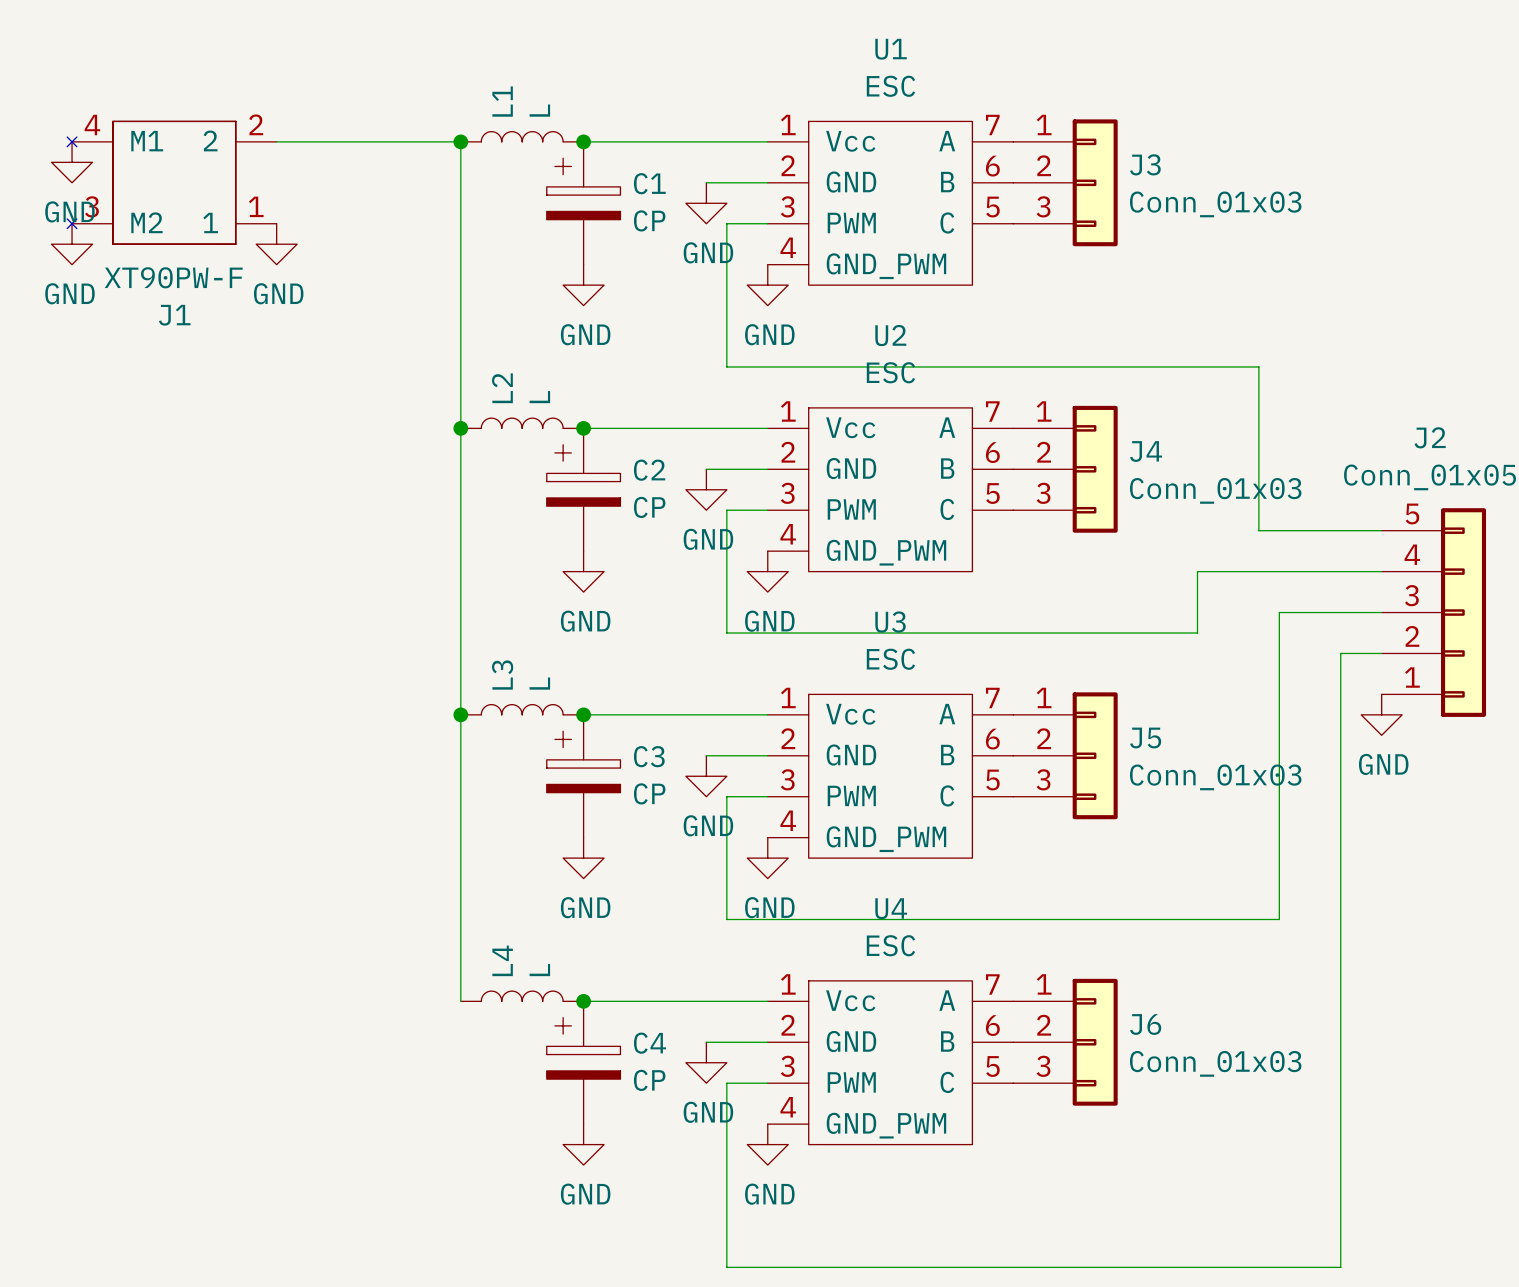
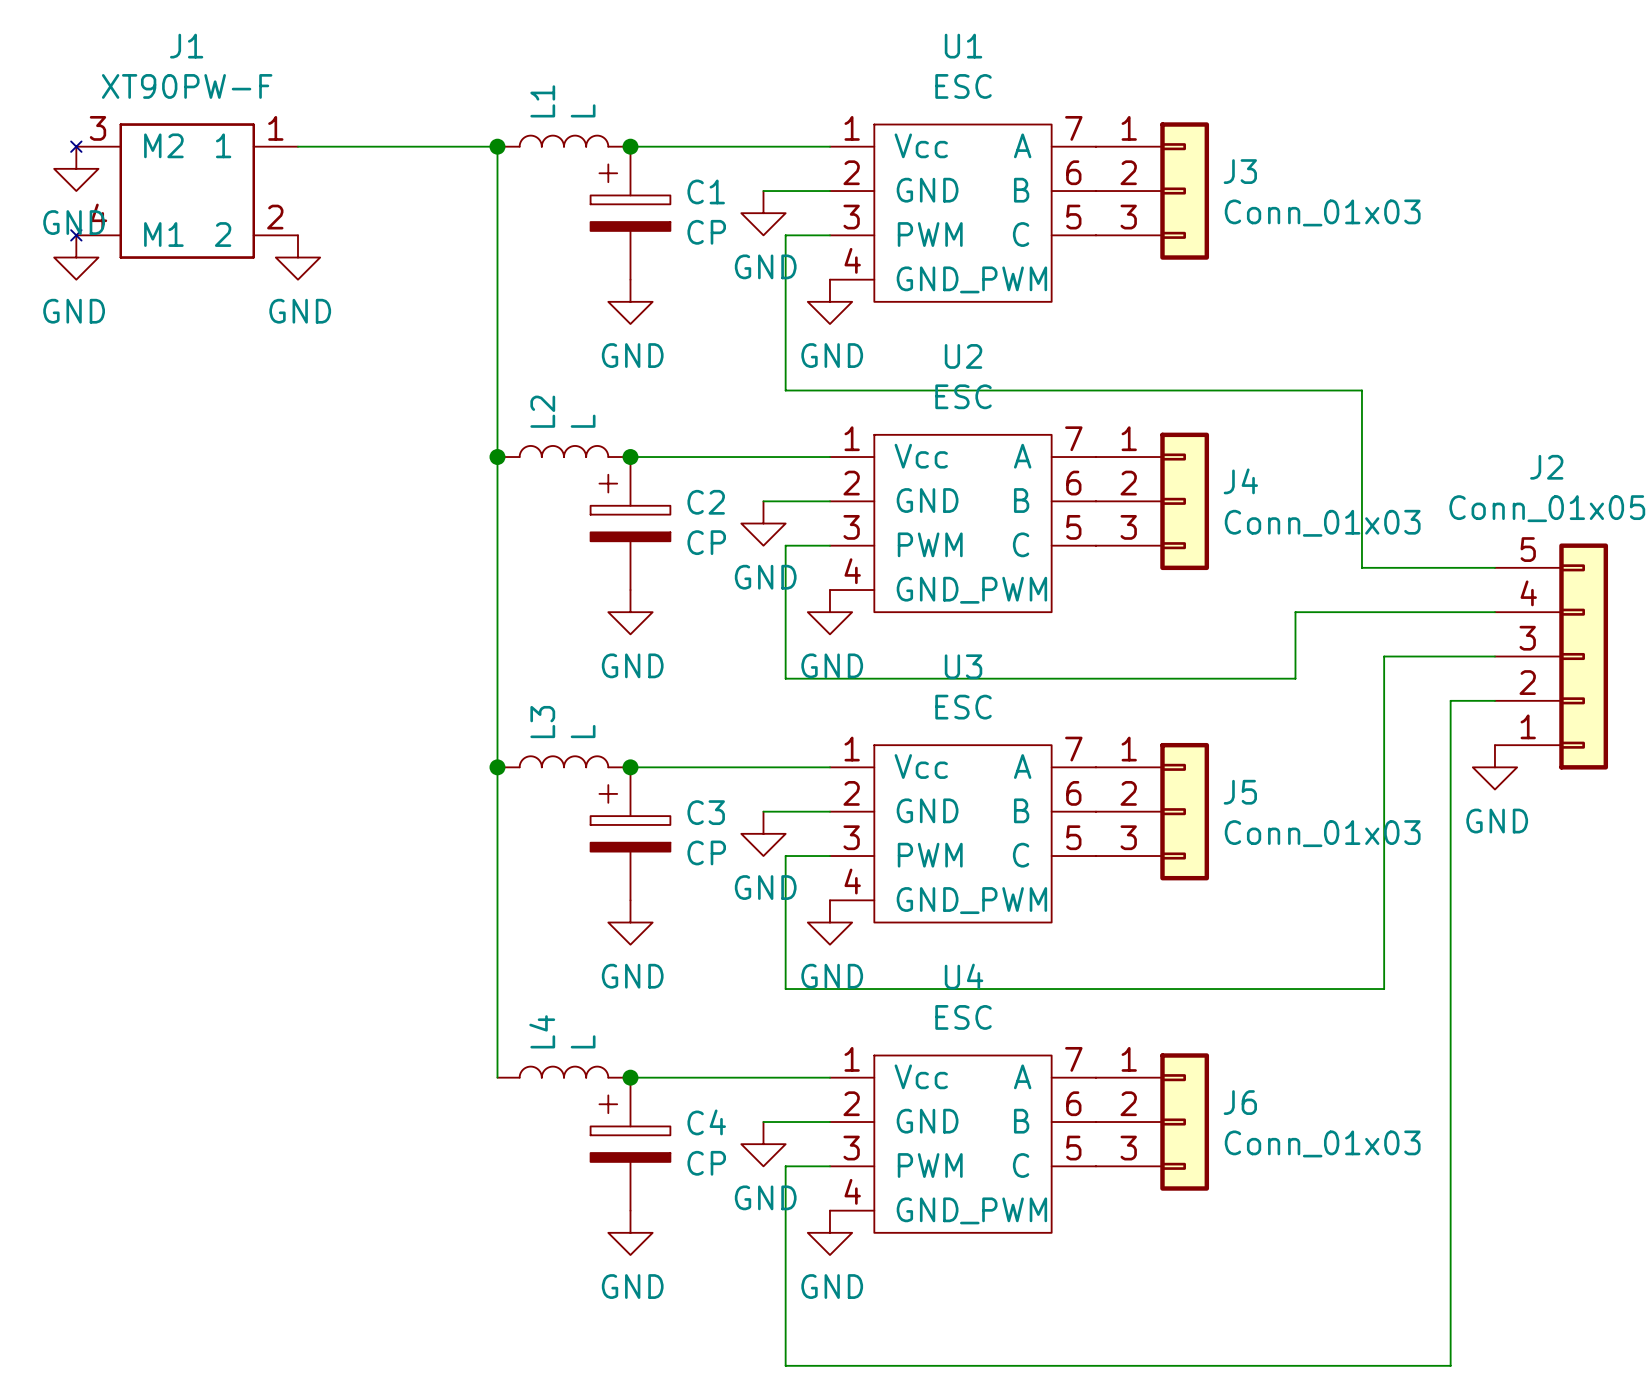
J1 flip: as is (151, 182) -> up-down (162, 191)

